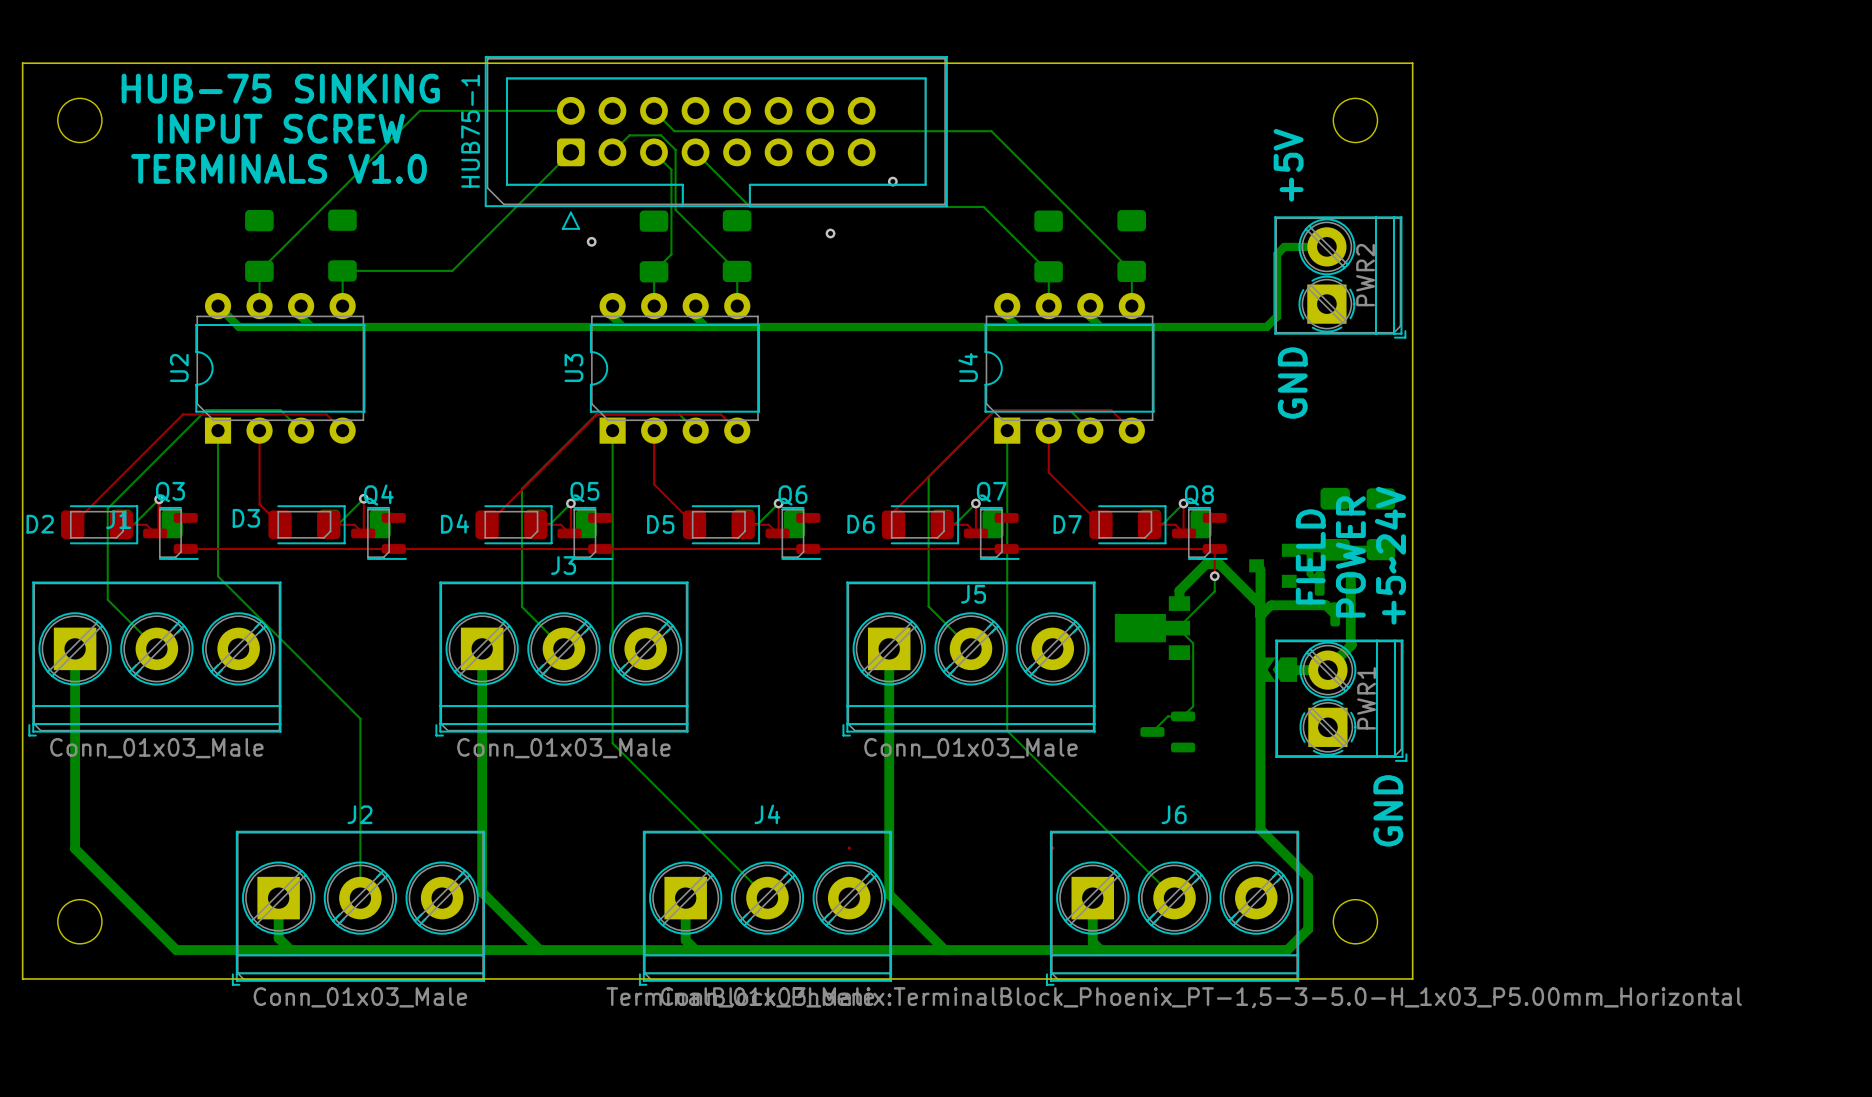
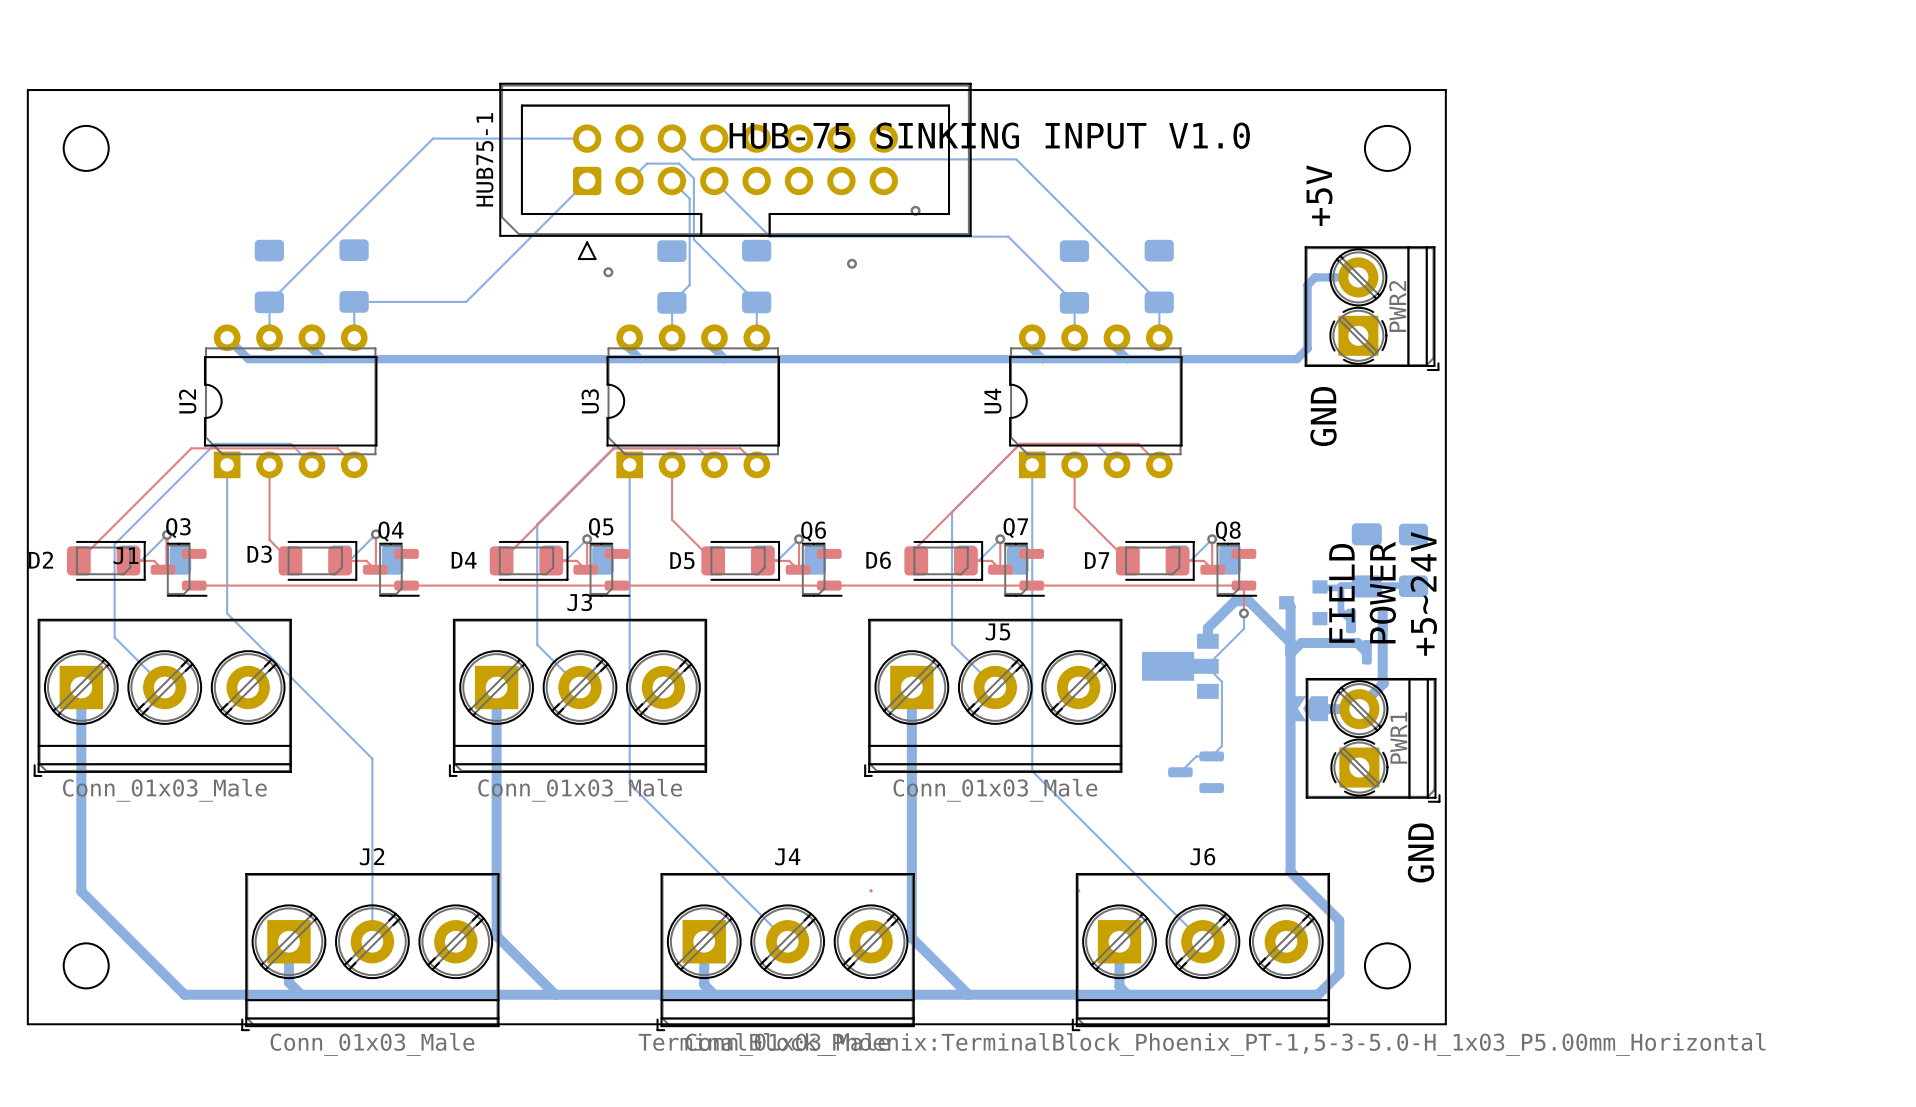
text: HUB-75 SINKING (280, 88) -> none
text: none -> HUB-75 SINKING INPUT V1.0 (989, 135)
text: INPUT SCREW (281, 128) -> none
text: TERMINALS V1.0 (278, 168) -> none

